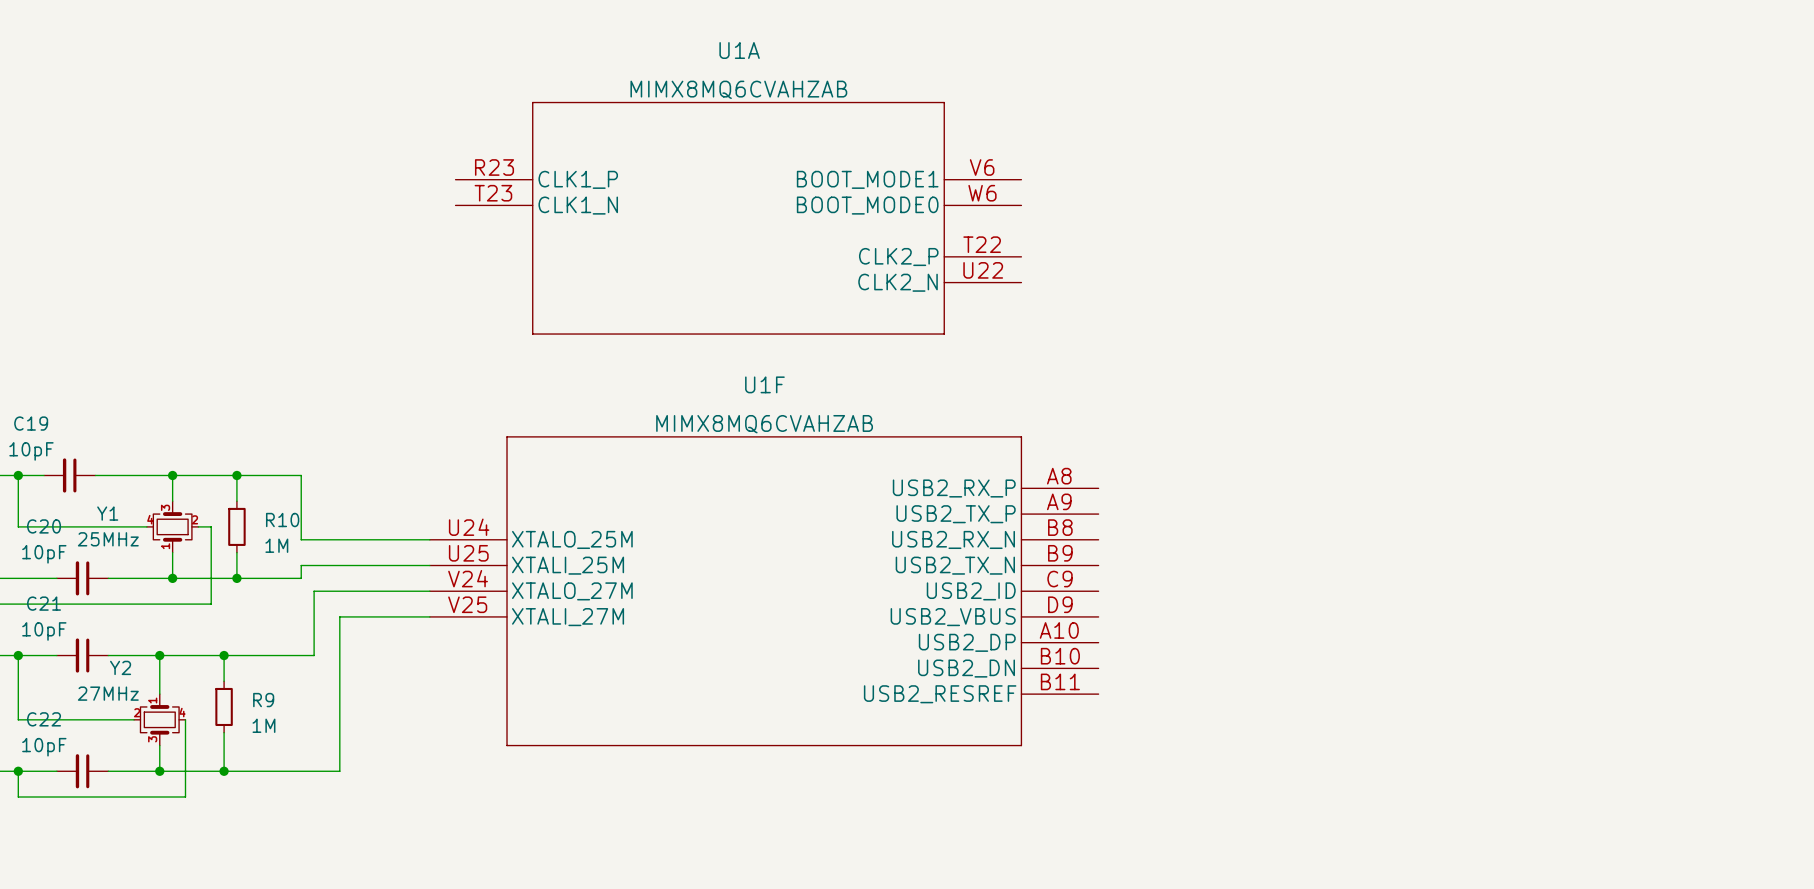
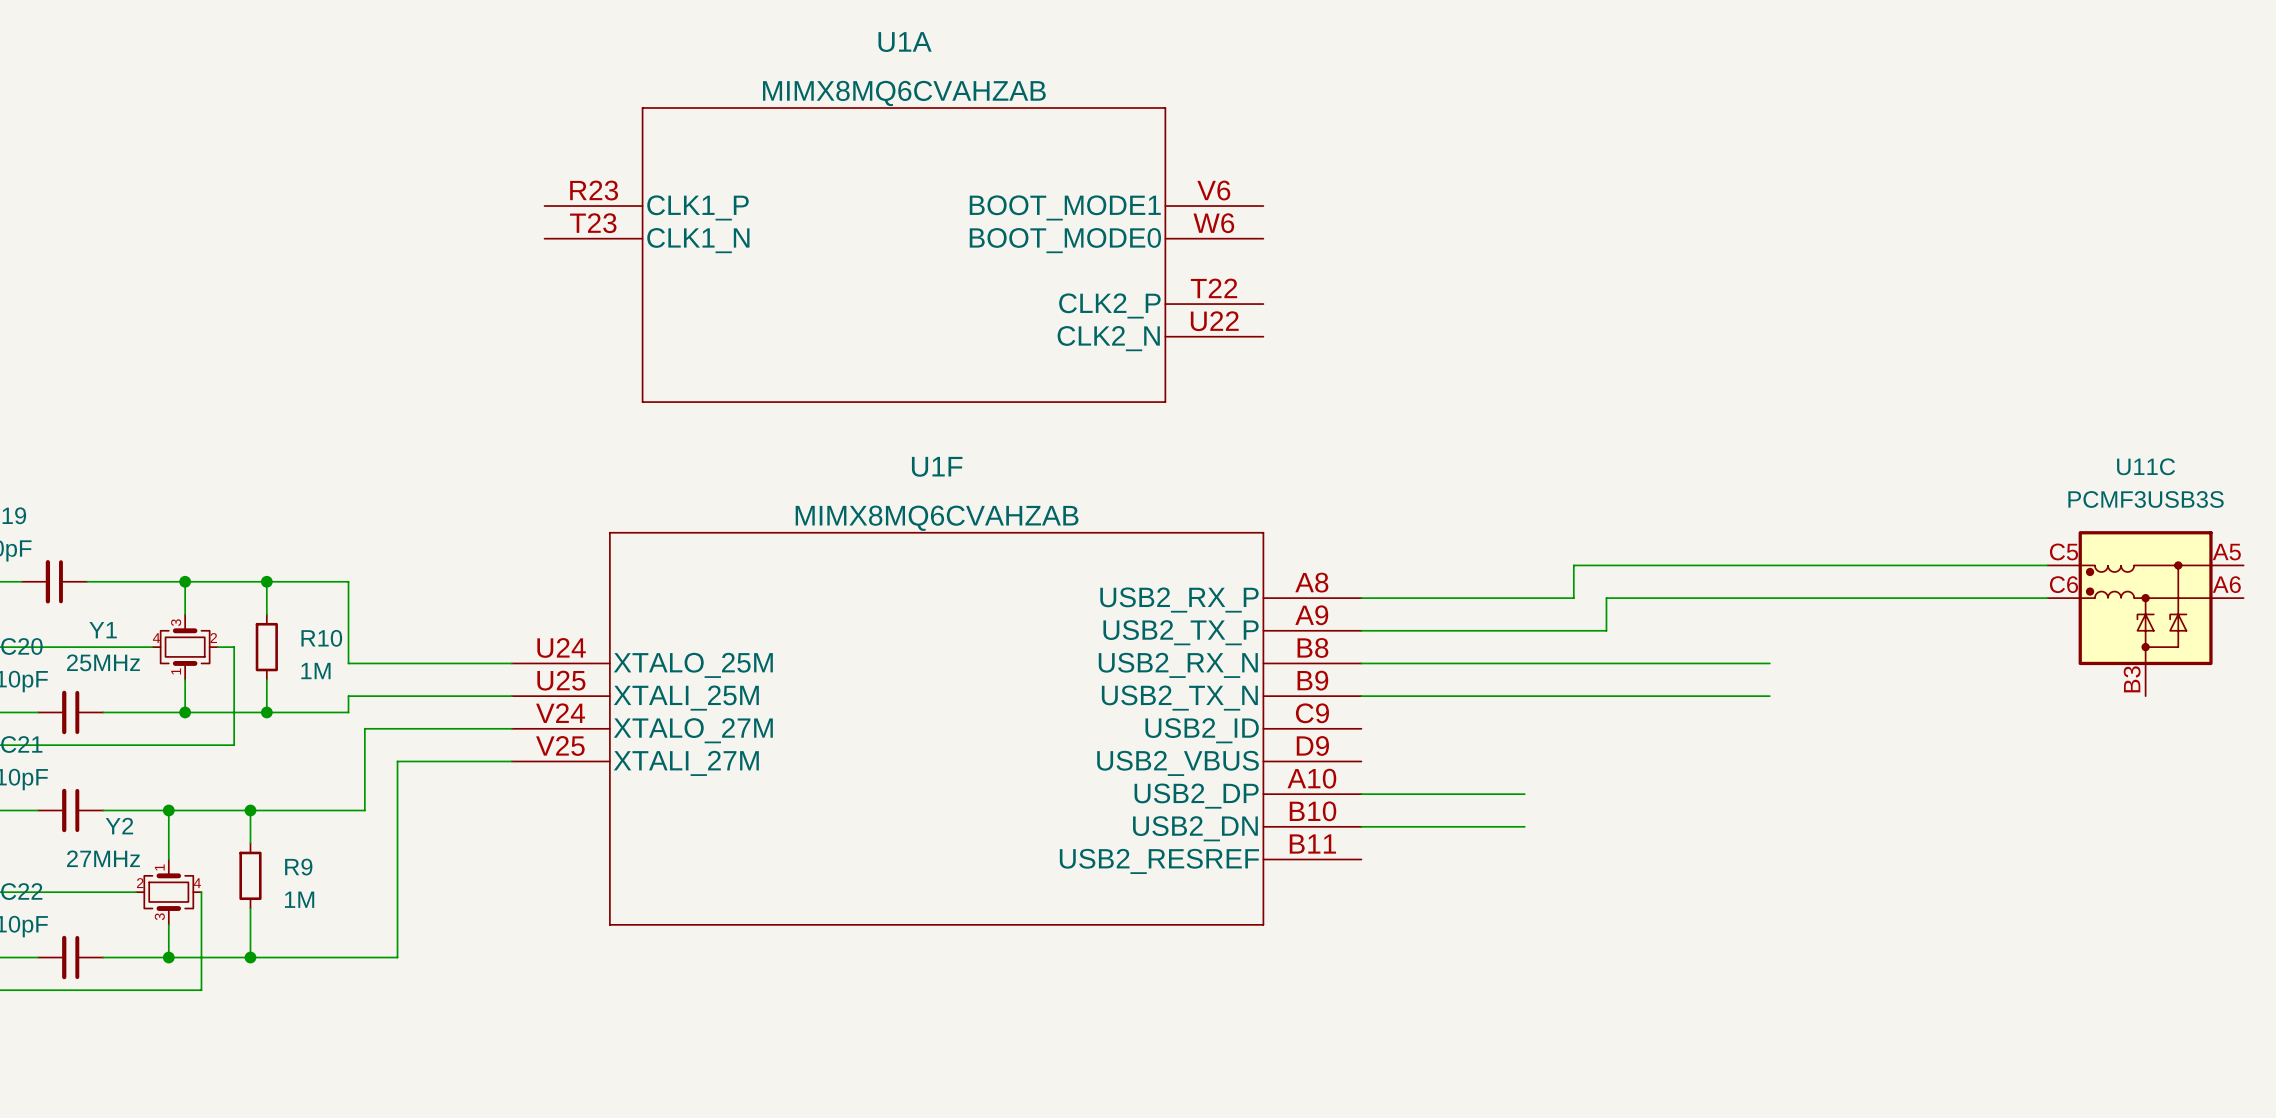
wire: none -> (2047, 565) (1573, 565) (1573, 598) (1361, 598)
wire: none -> (2047, 598) (1606, 598) (1606, 630) (1361, 630)
U11C: none -> PCMF3USB3S (2145, 613)
wire: none -> (1361, 663) (1769, 663)
wire: none -> (1361, 696) (1769, 696)
wire: none -> (1361, 794) (1524, 794)
wire: none -> (1361, 826) (1524, 826)

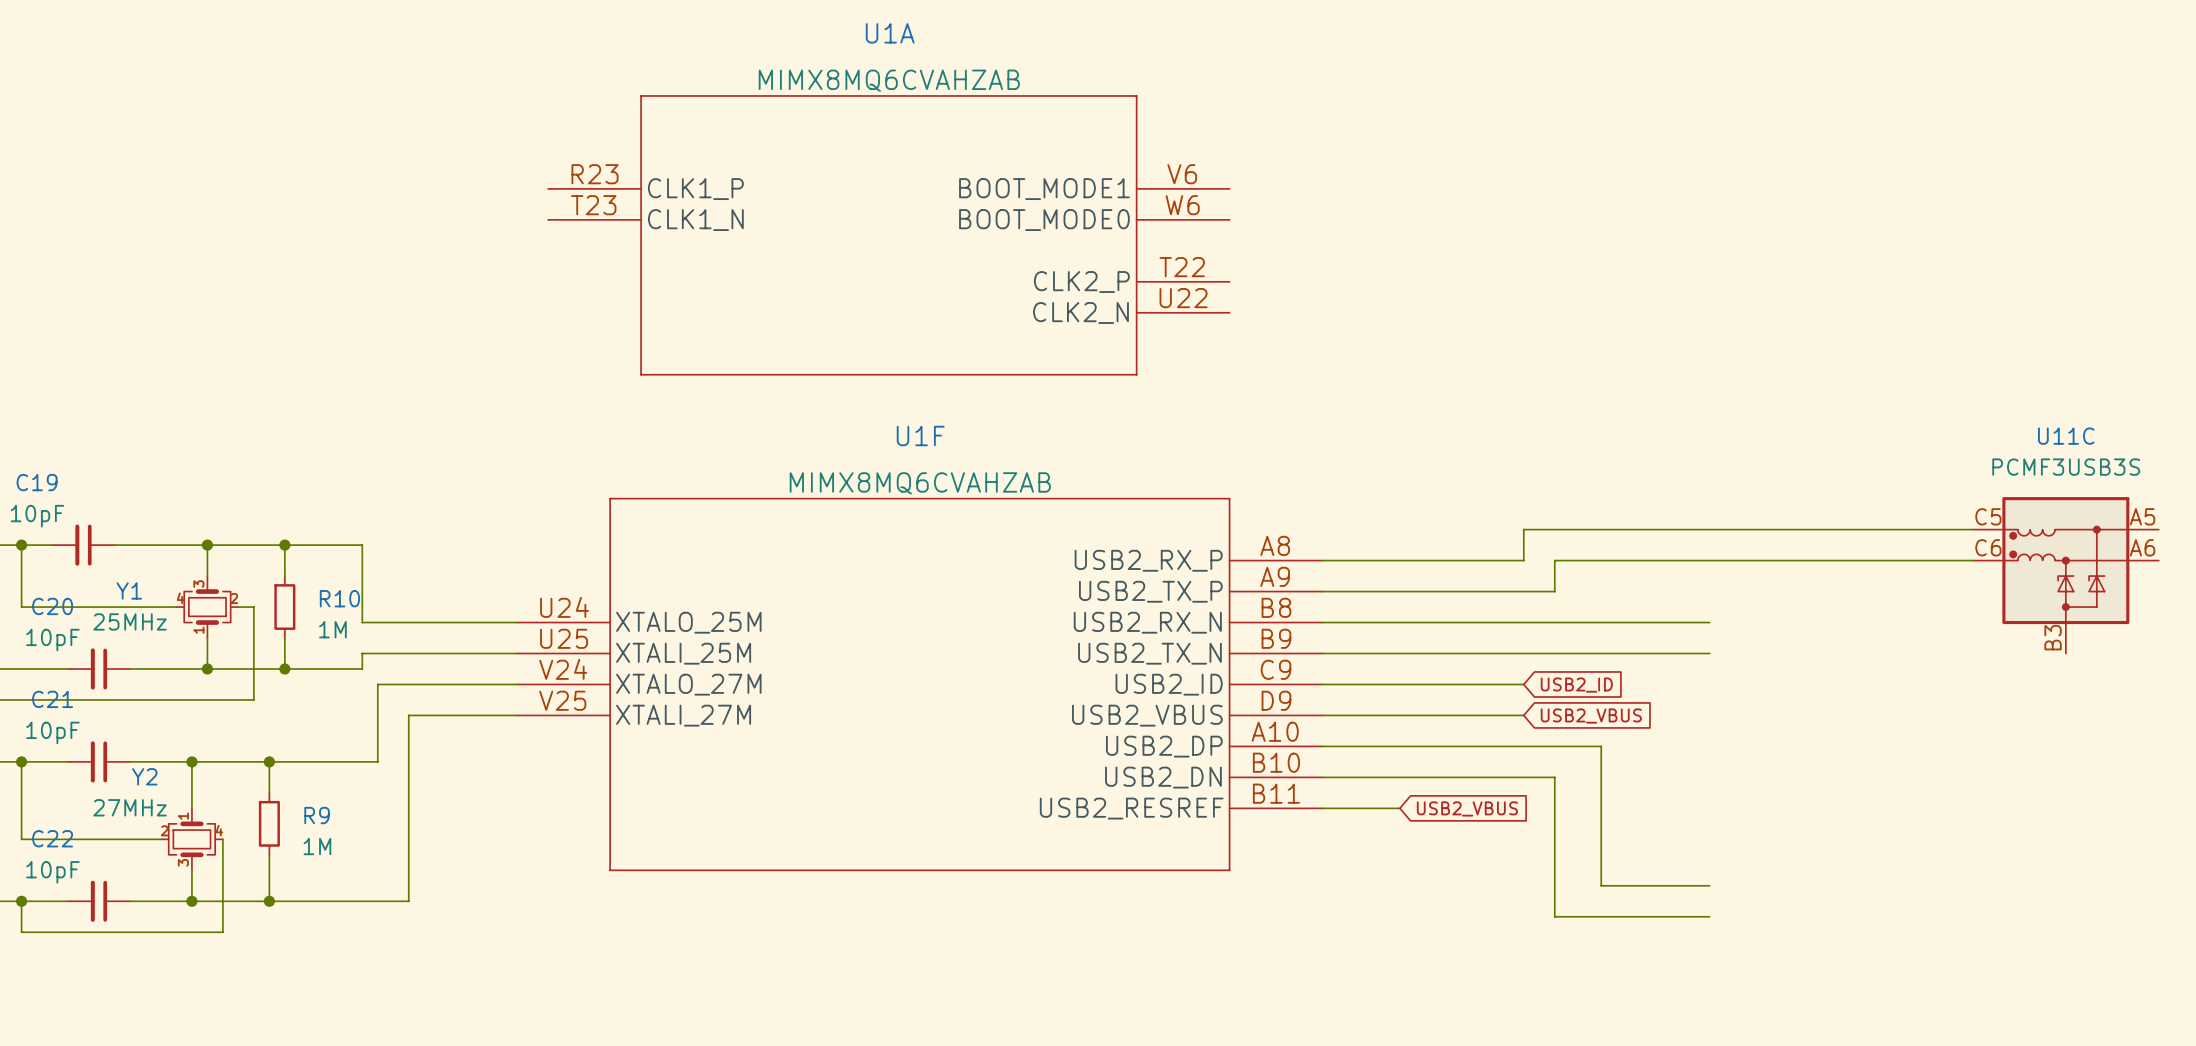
wire: none -> (1322, 684) (1523, 684)
global label: none -> USB2_ID (1576, 685)
wire: none -> (1322, 715) (1523, 715)
global label: none -> USB2_VBUS (1591, 716)
wire: none -> (1477, 746) (1601, 746) (1601, 885) (1709, 885)
wire: none -> (1477, 777) (1554, 777) (1554, 916) (1709, 916)
wire: none -> (1322, 808) (1399, 808)
global label: none -> USB2_VBUS (1467, 808)

